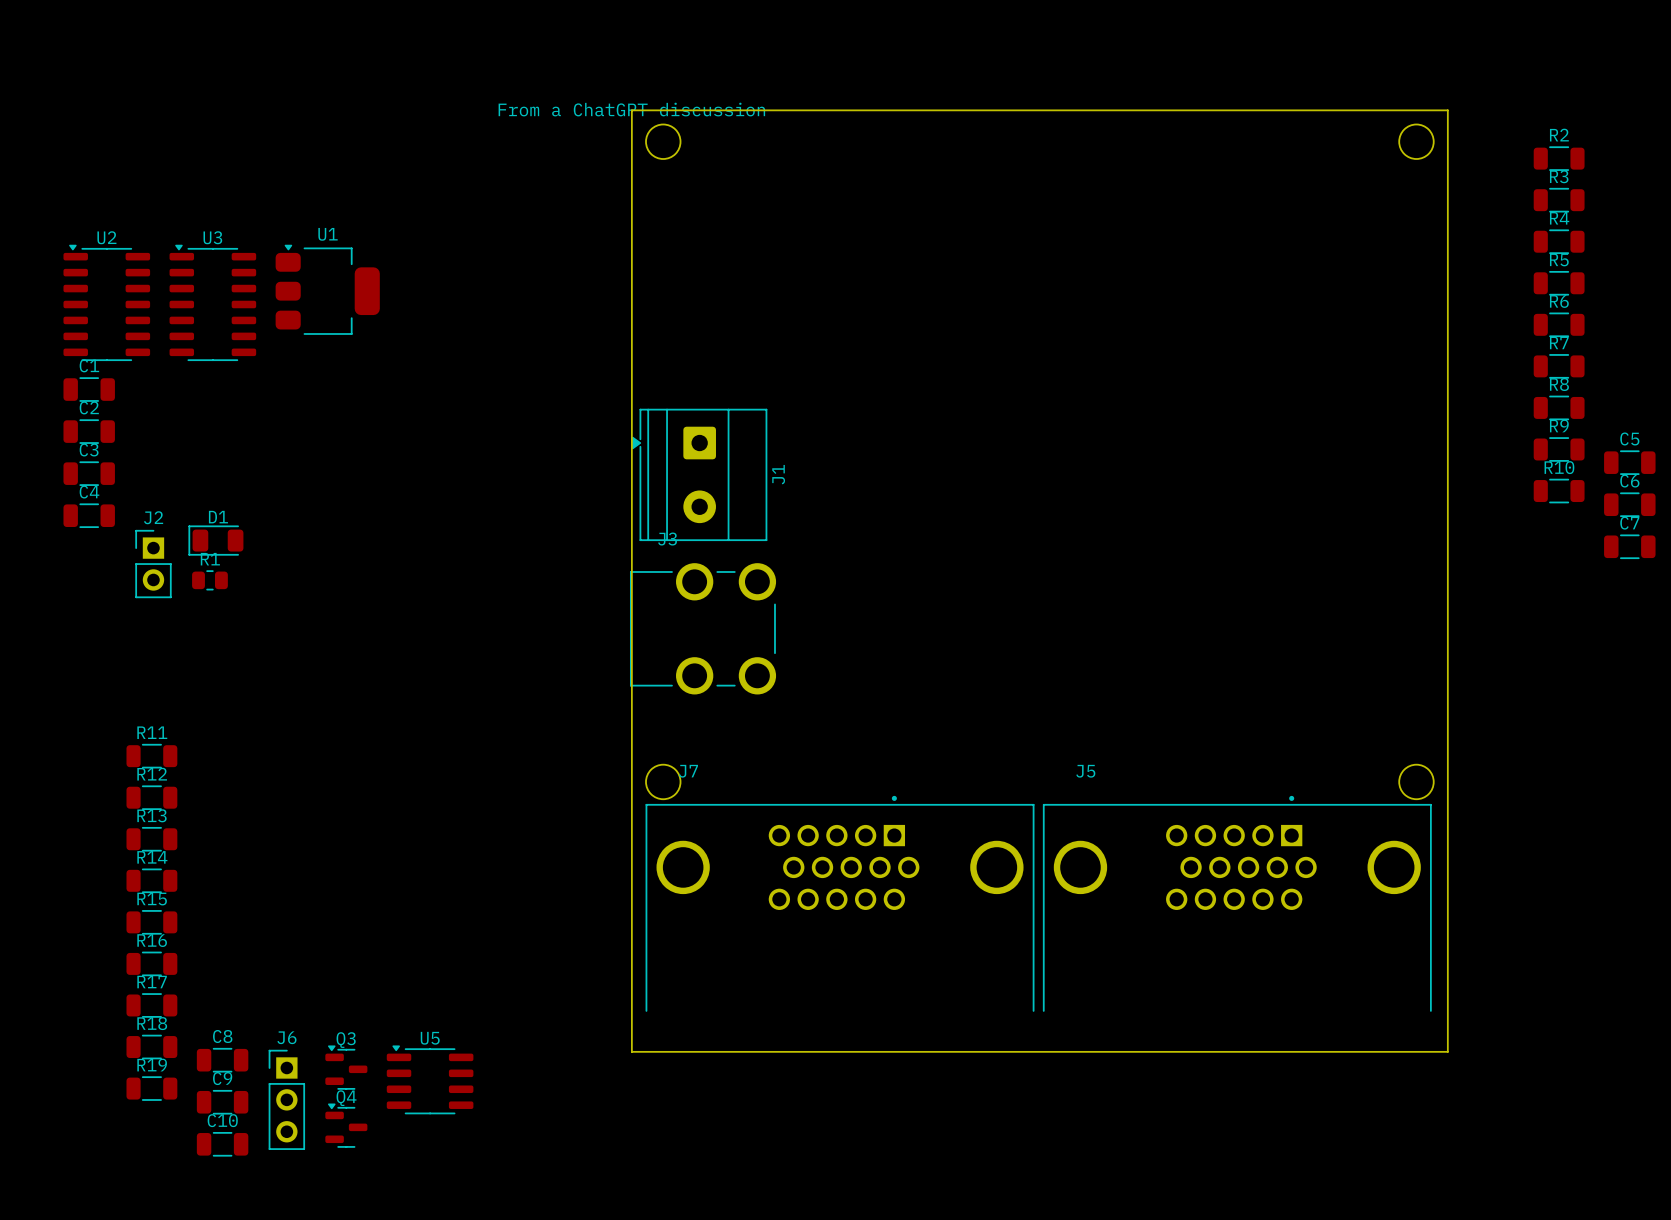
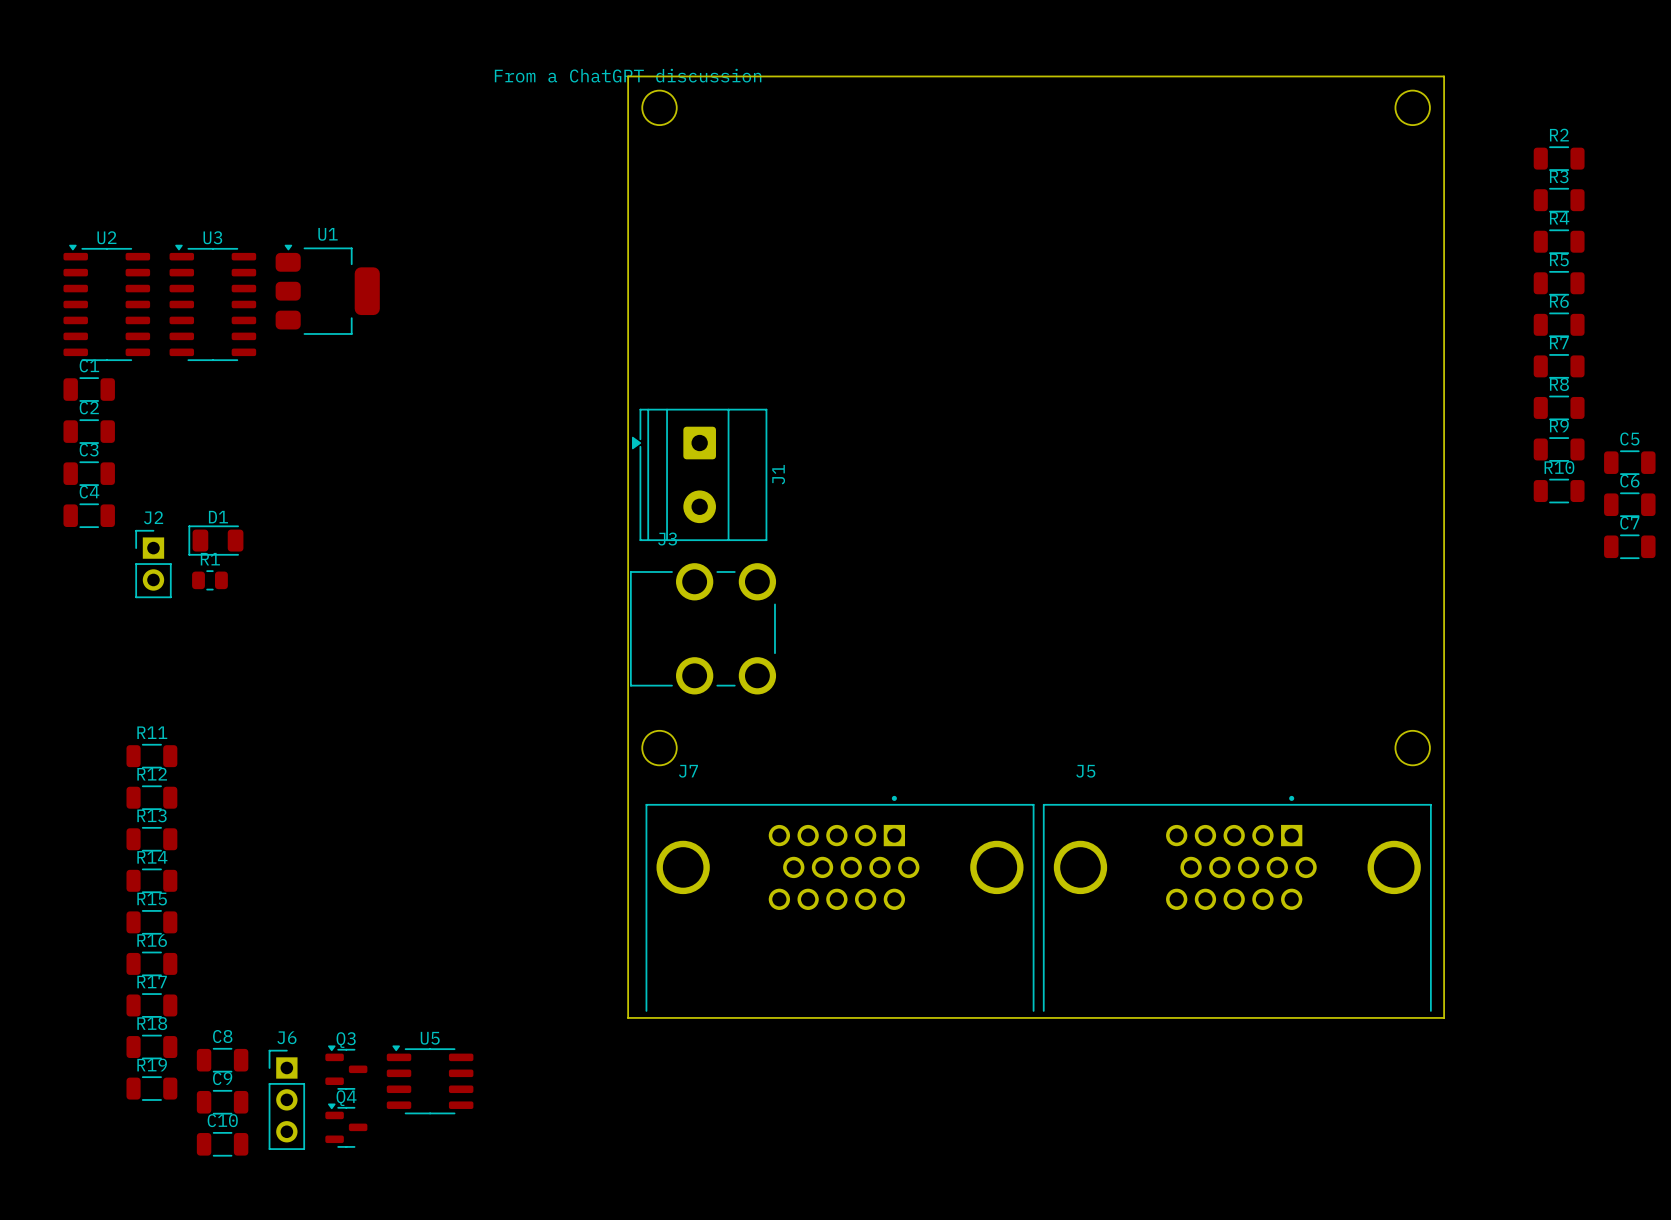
part position: (1039, 581) -> (1036, 547)

